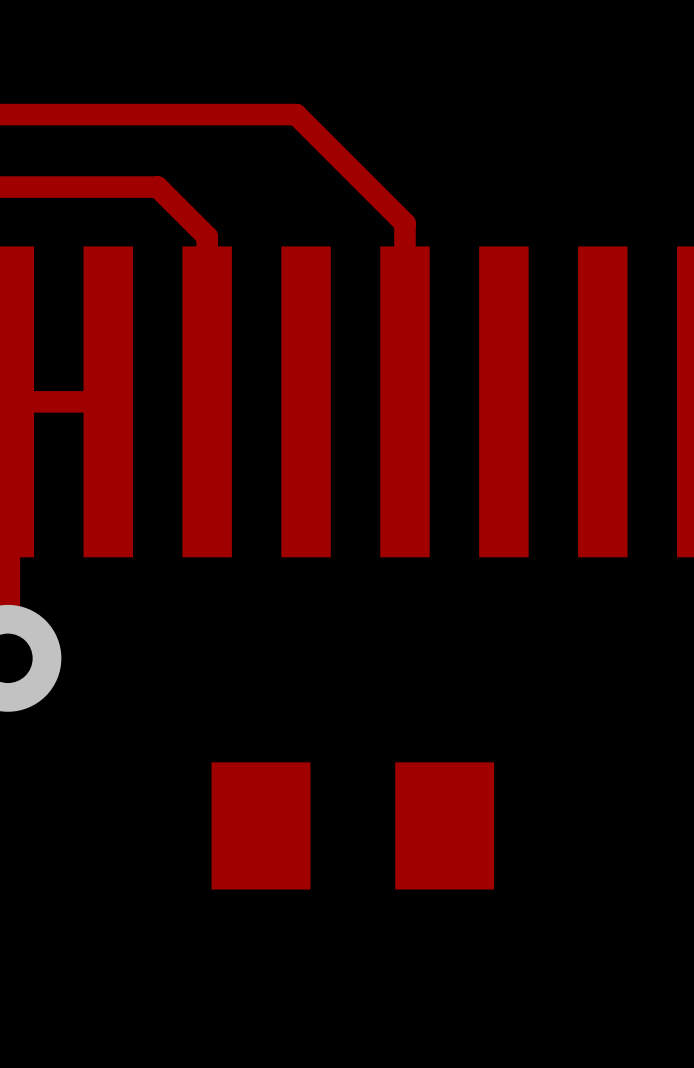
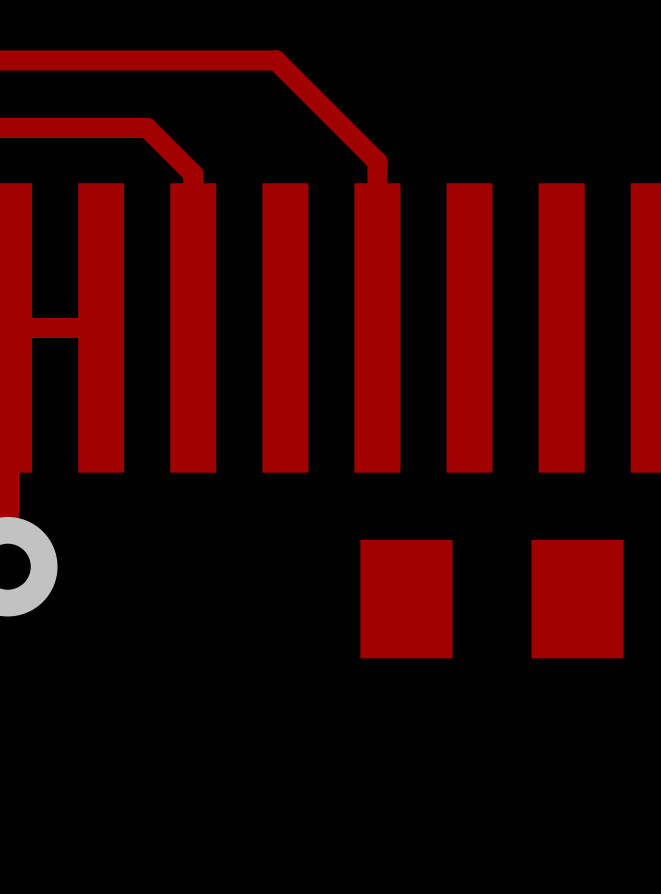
part position: (352, 825) -> (491, 599)

